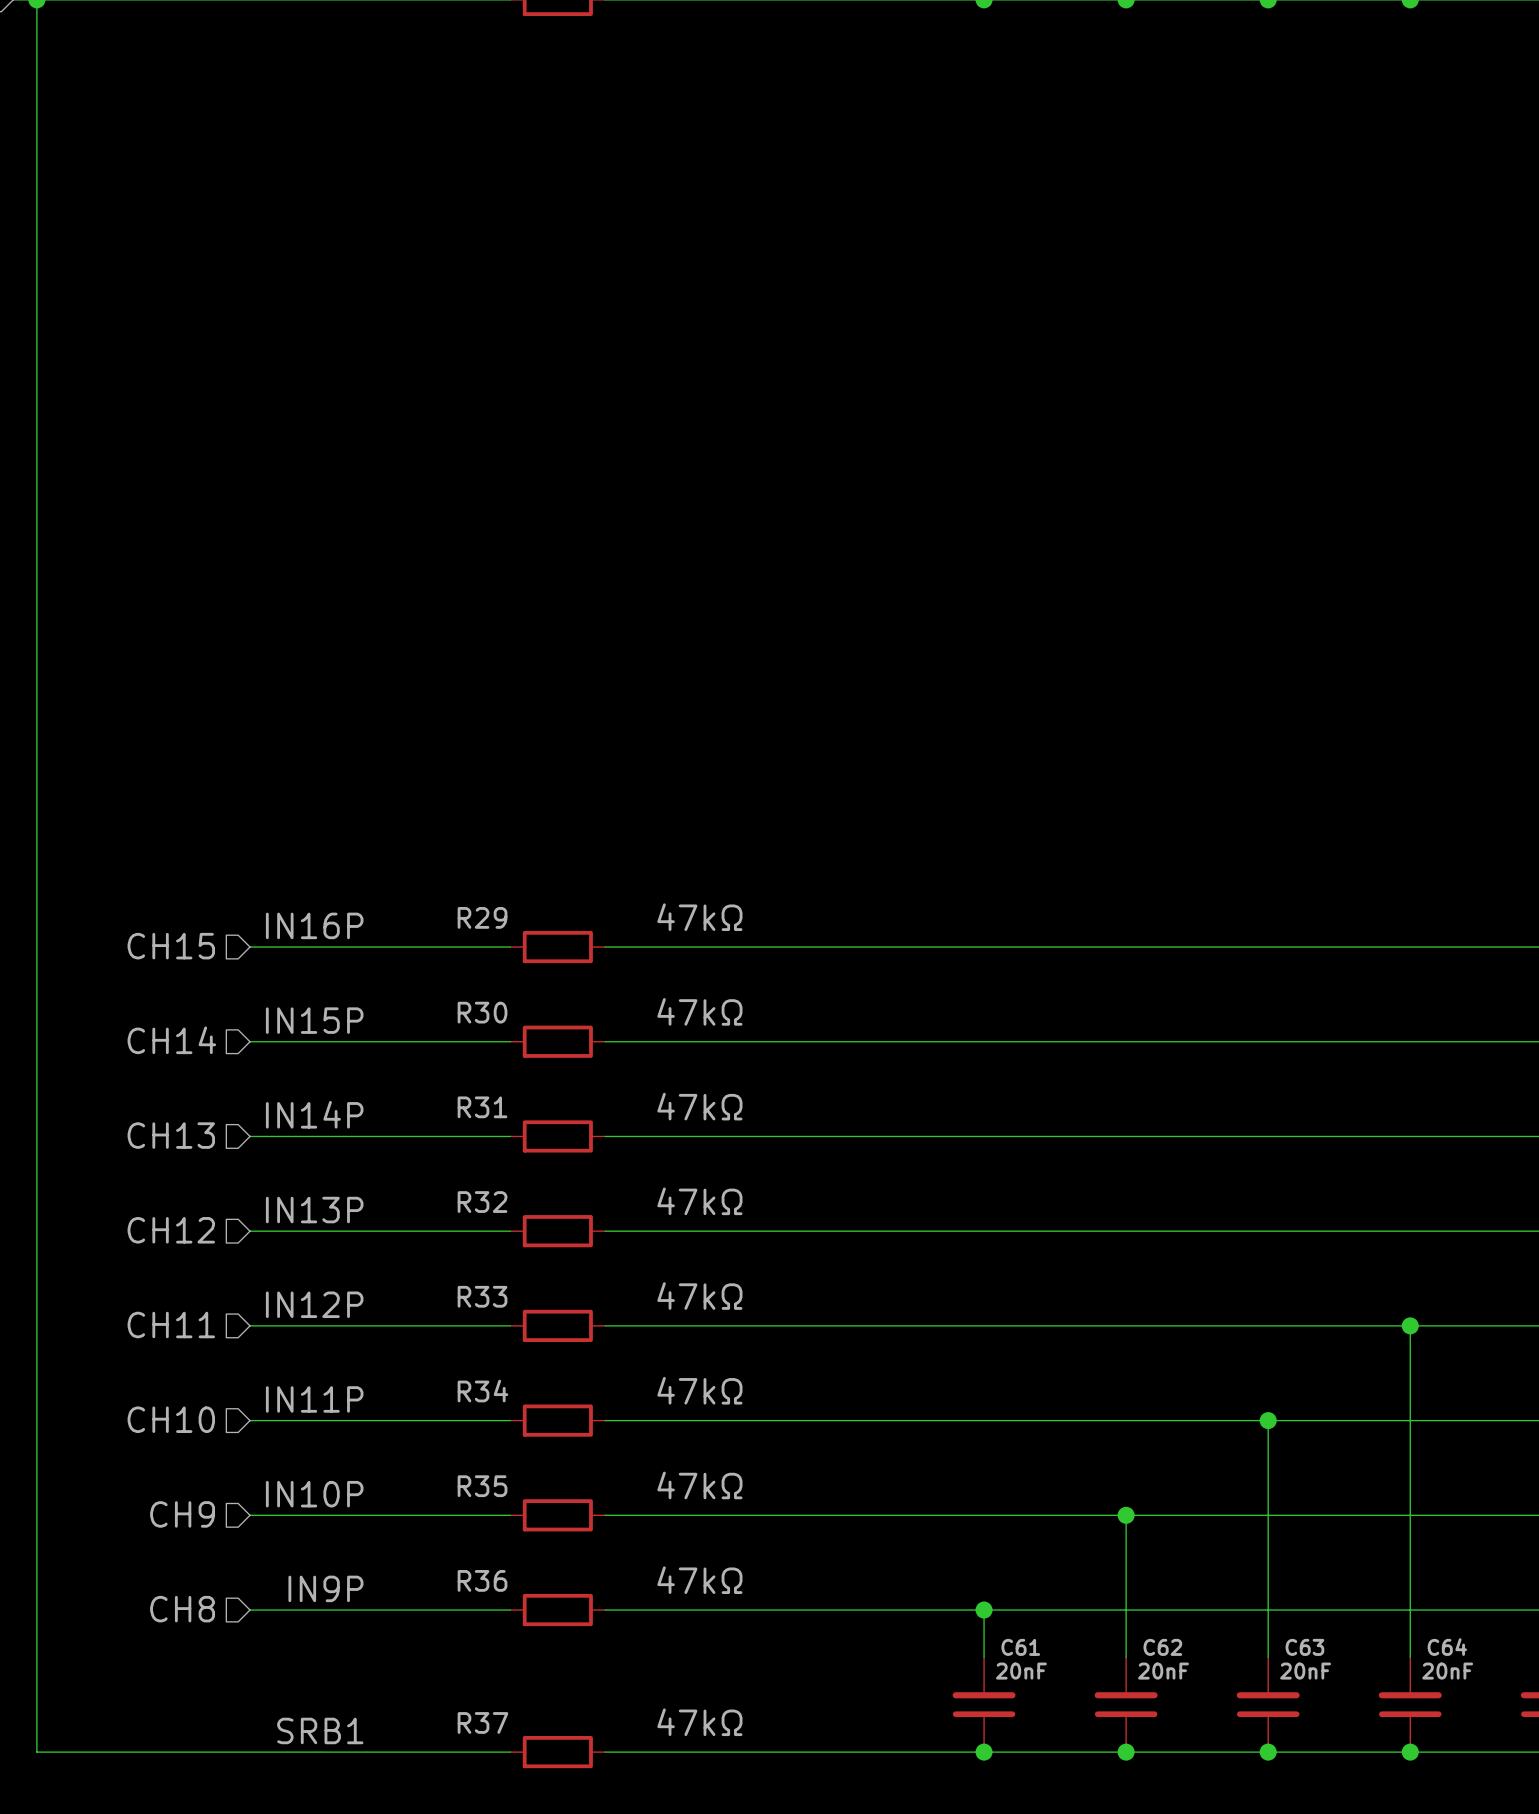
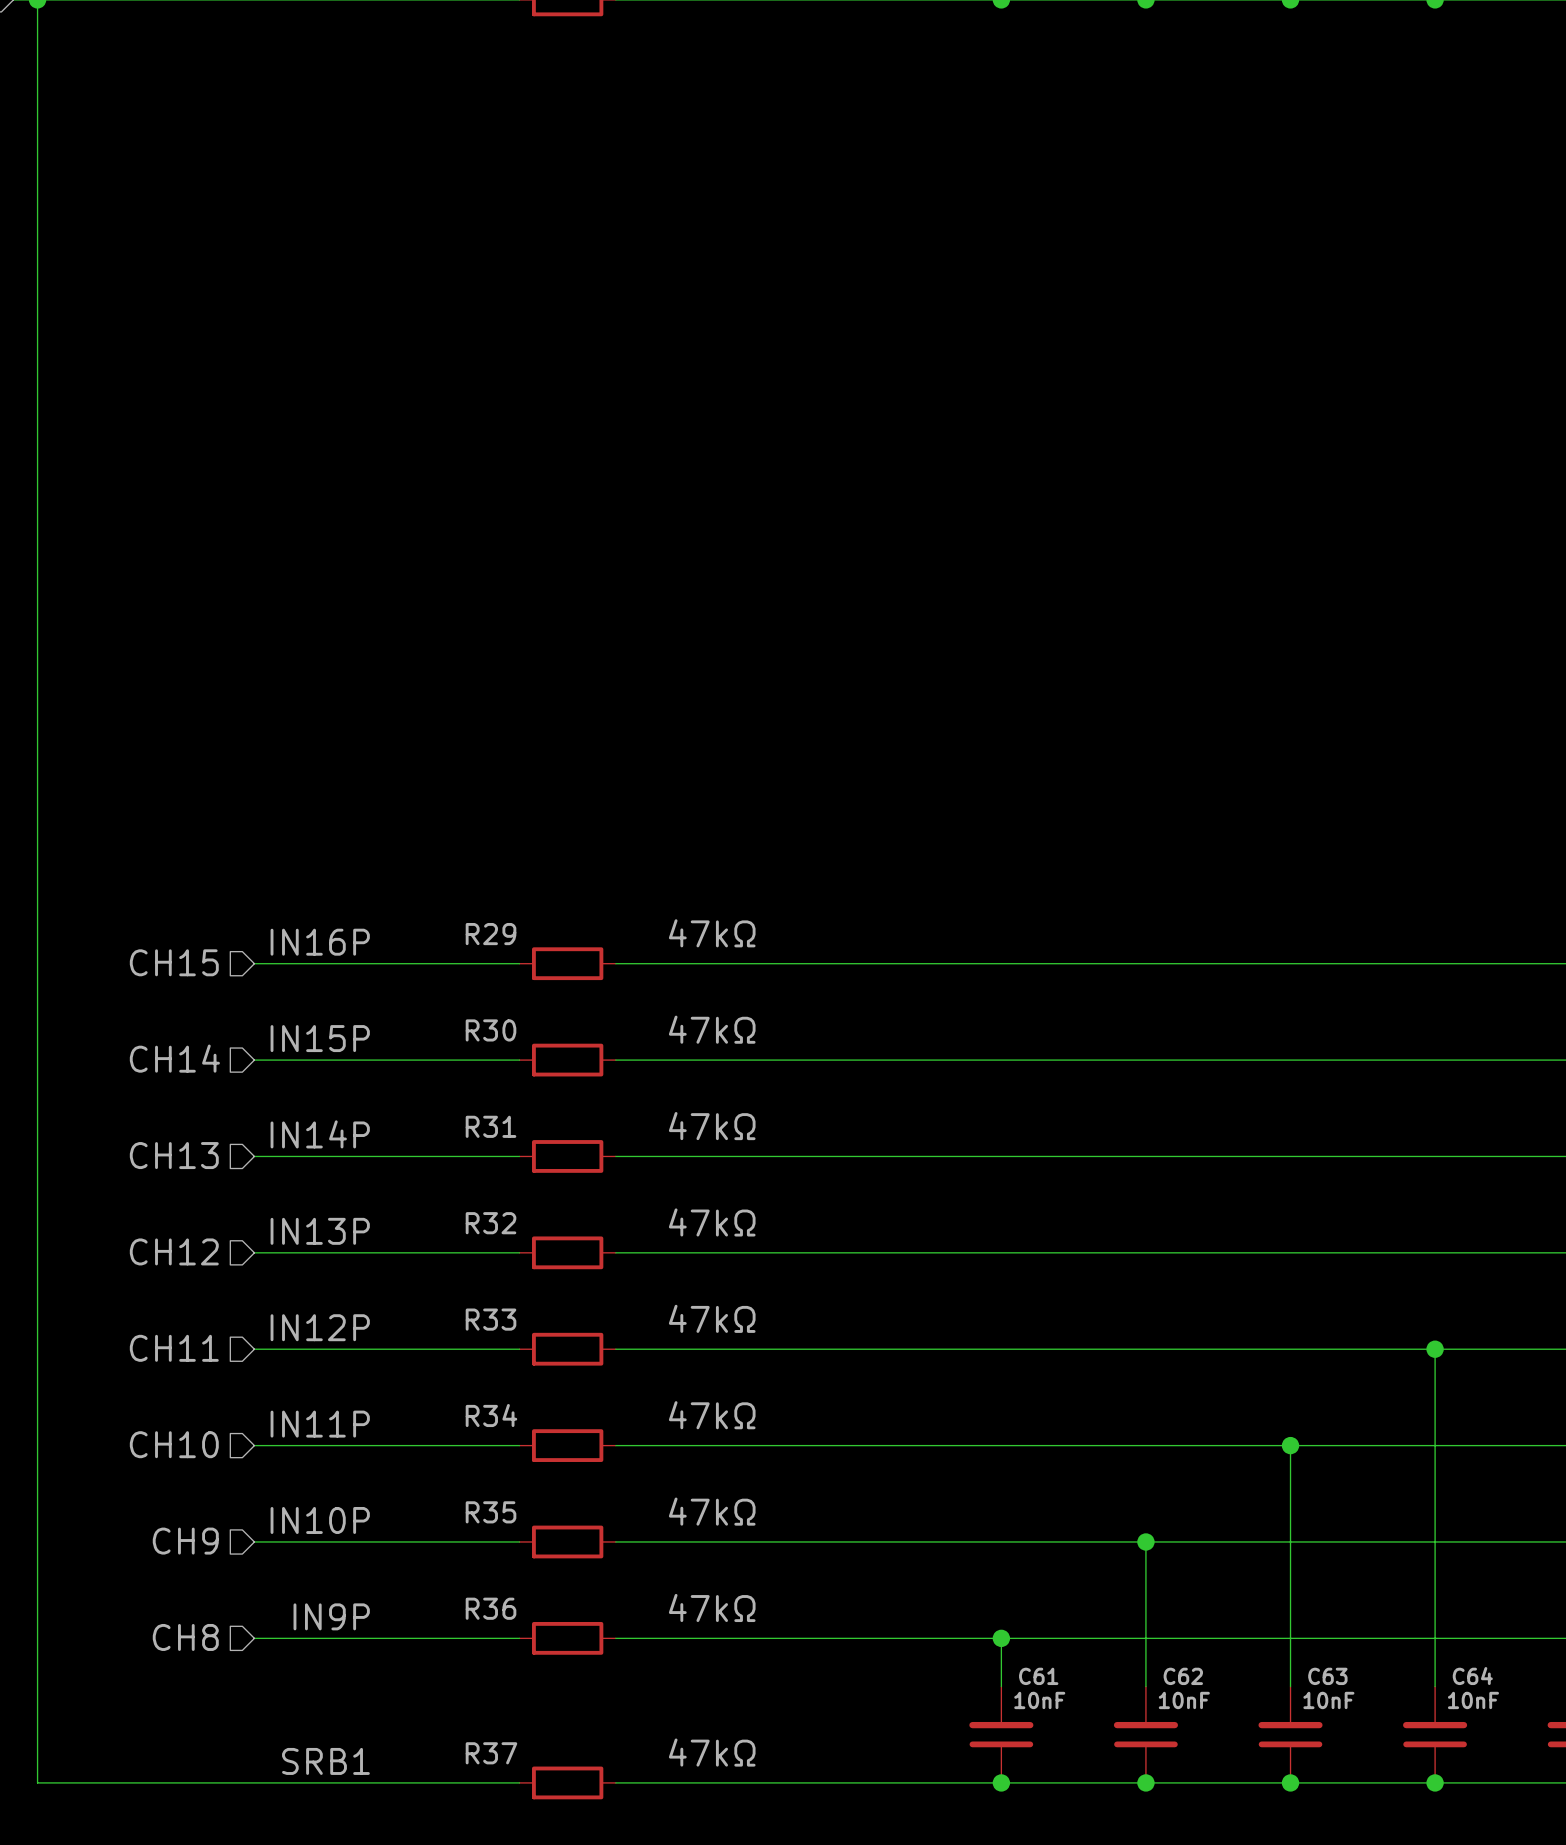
C61 value: 20nF (1021, 1671) -> 10nF (1039, 1700)
C62 value: 20nF (1163, 1671) -> 10nF (1184, 1700)
C63 value: 20nF (1305, 1671) -> 10nF (1328, 1700)
C64 value: 20nF (1447, 1671) -> 10nF (1473, 1700)

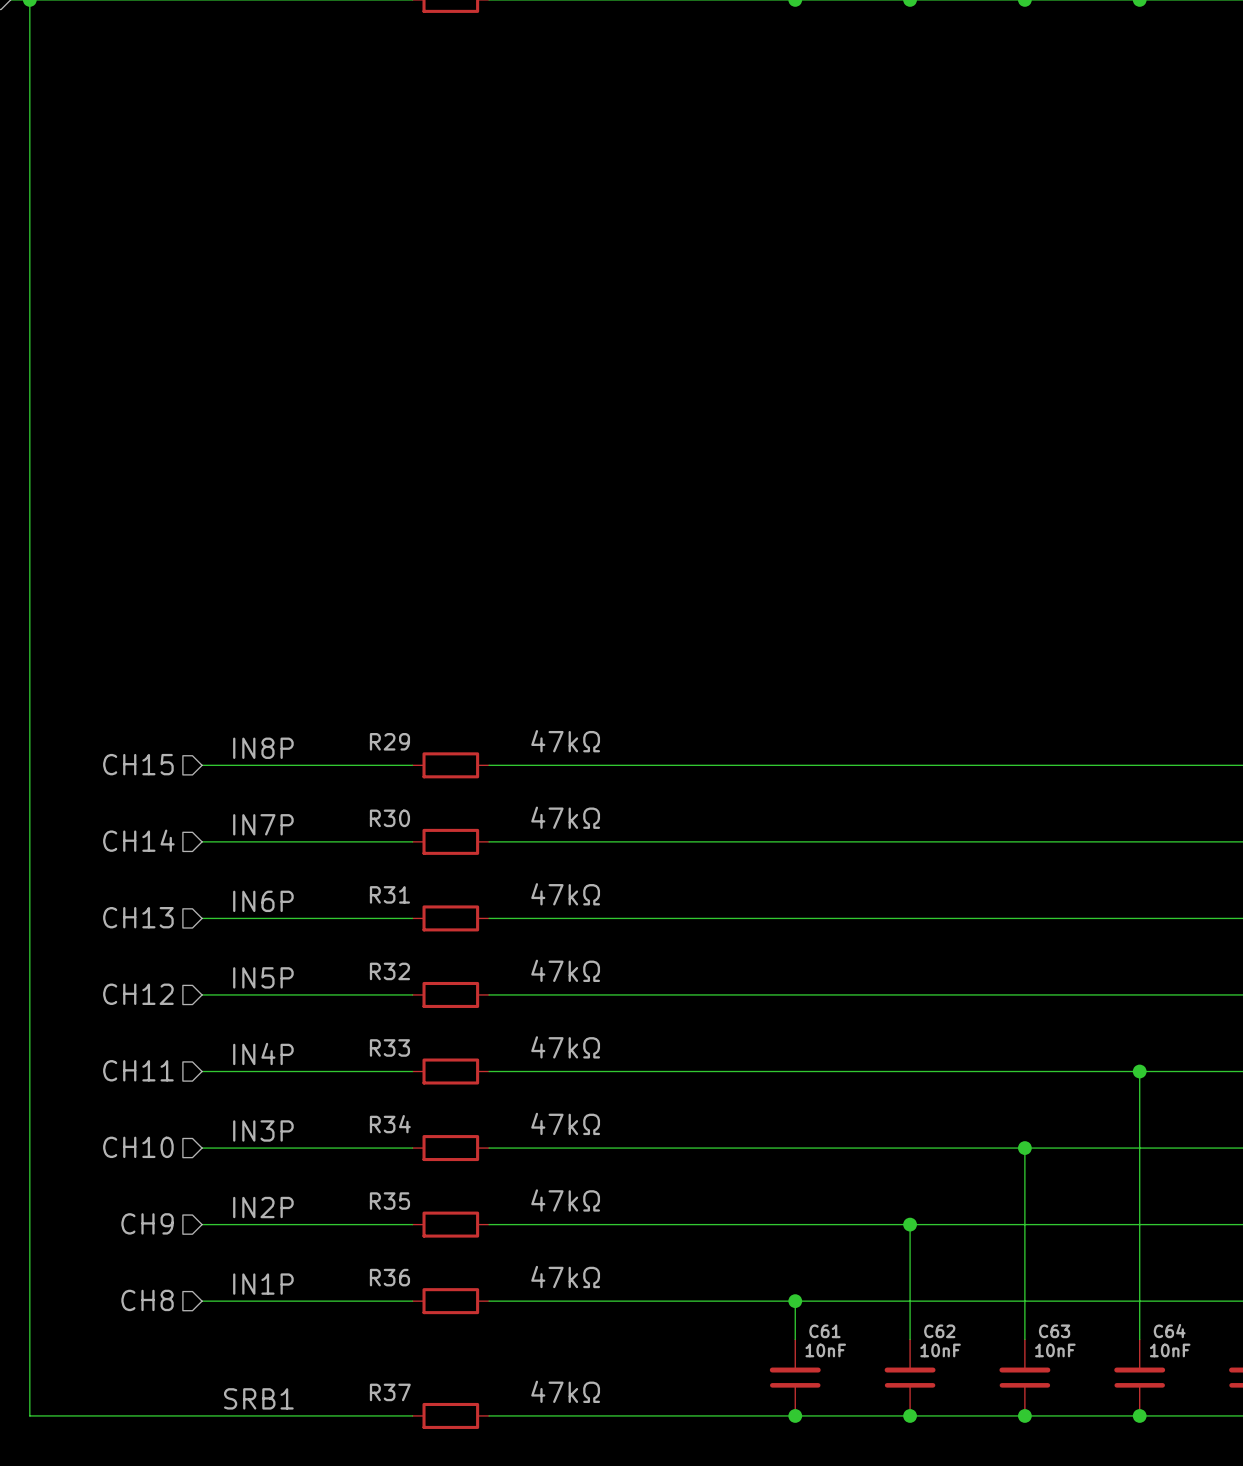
label: IN16P (320, 942) -> IN8P (263, 748)
label: IN15P (320, 1038) -> IN7P (263, 824)
label: IN14P (320, 1134) -> IN6P (263, 901)
label: IN13P (320, 1231) -> IN5P (263, 977)
label: IN12P (320, 1327) -> IN4P (263, 1053)
label: IN11P (320, 1424) -> IN3P (263, 1130)
label: IN10P (320, 1520) -> IN2P (263, 1207)
label: IN9P (331, 1616) -> IN1P (263, 1284)

